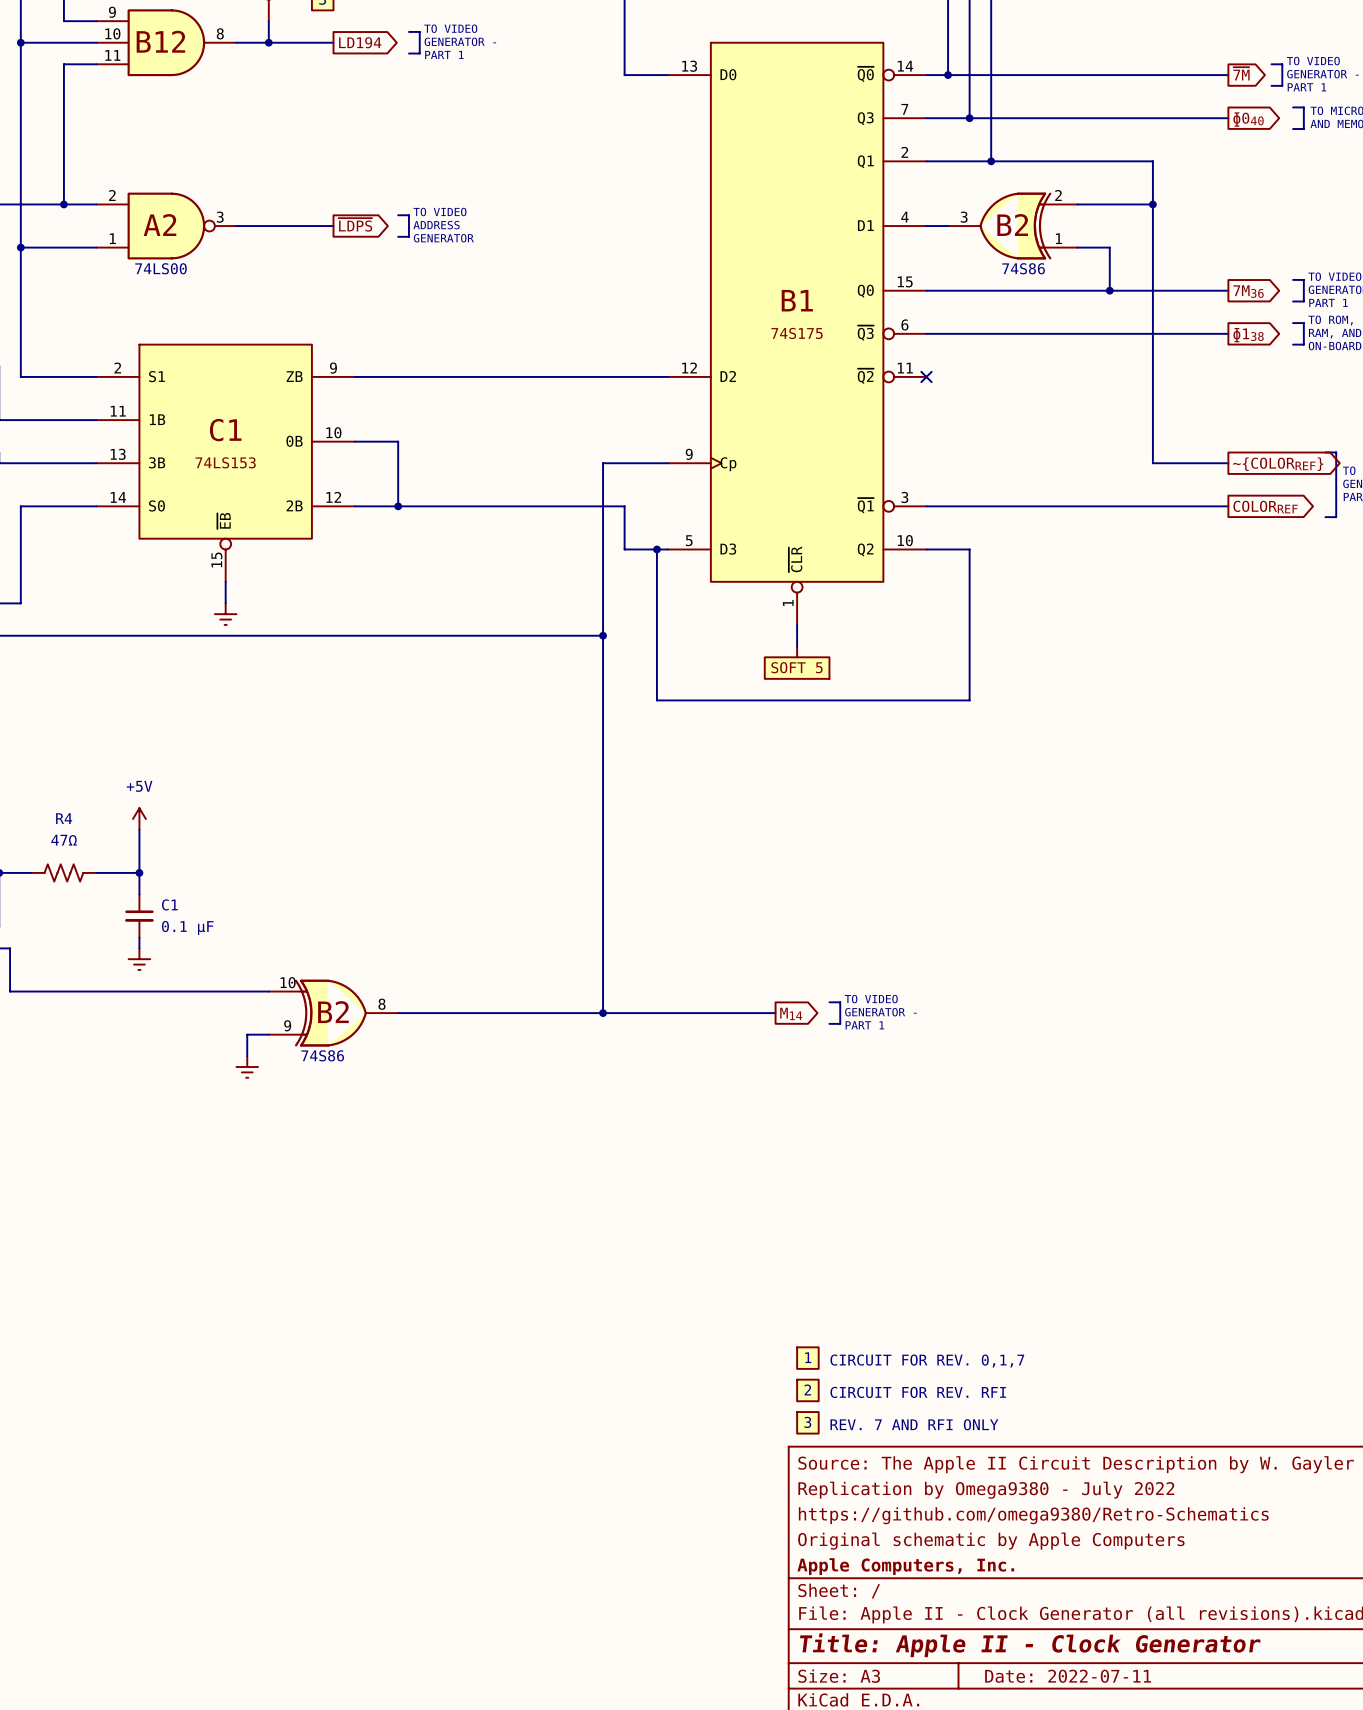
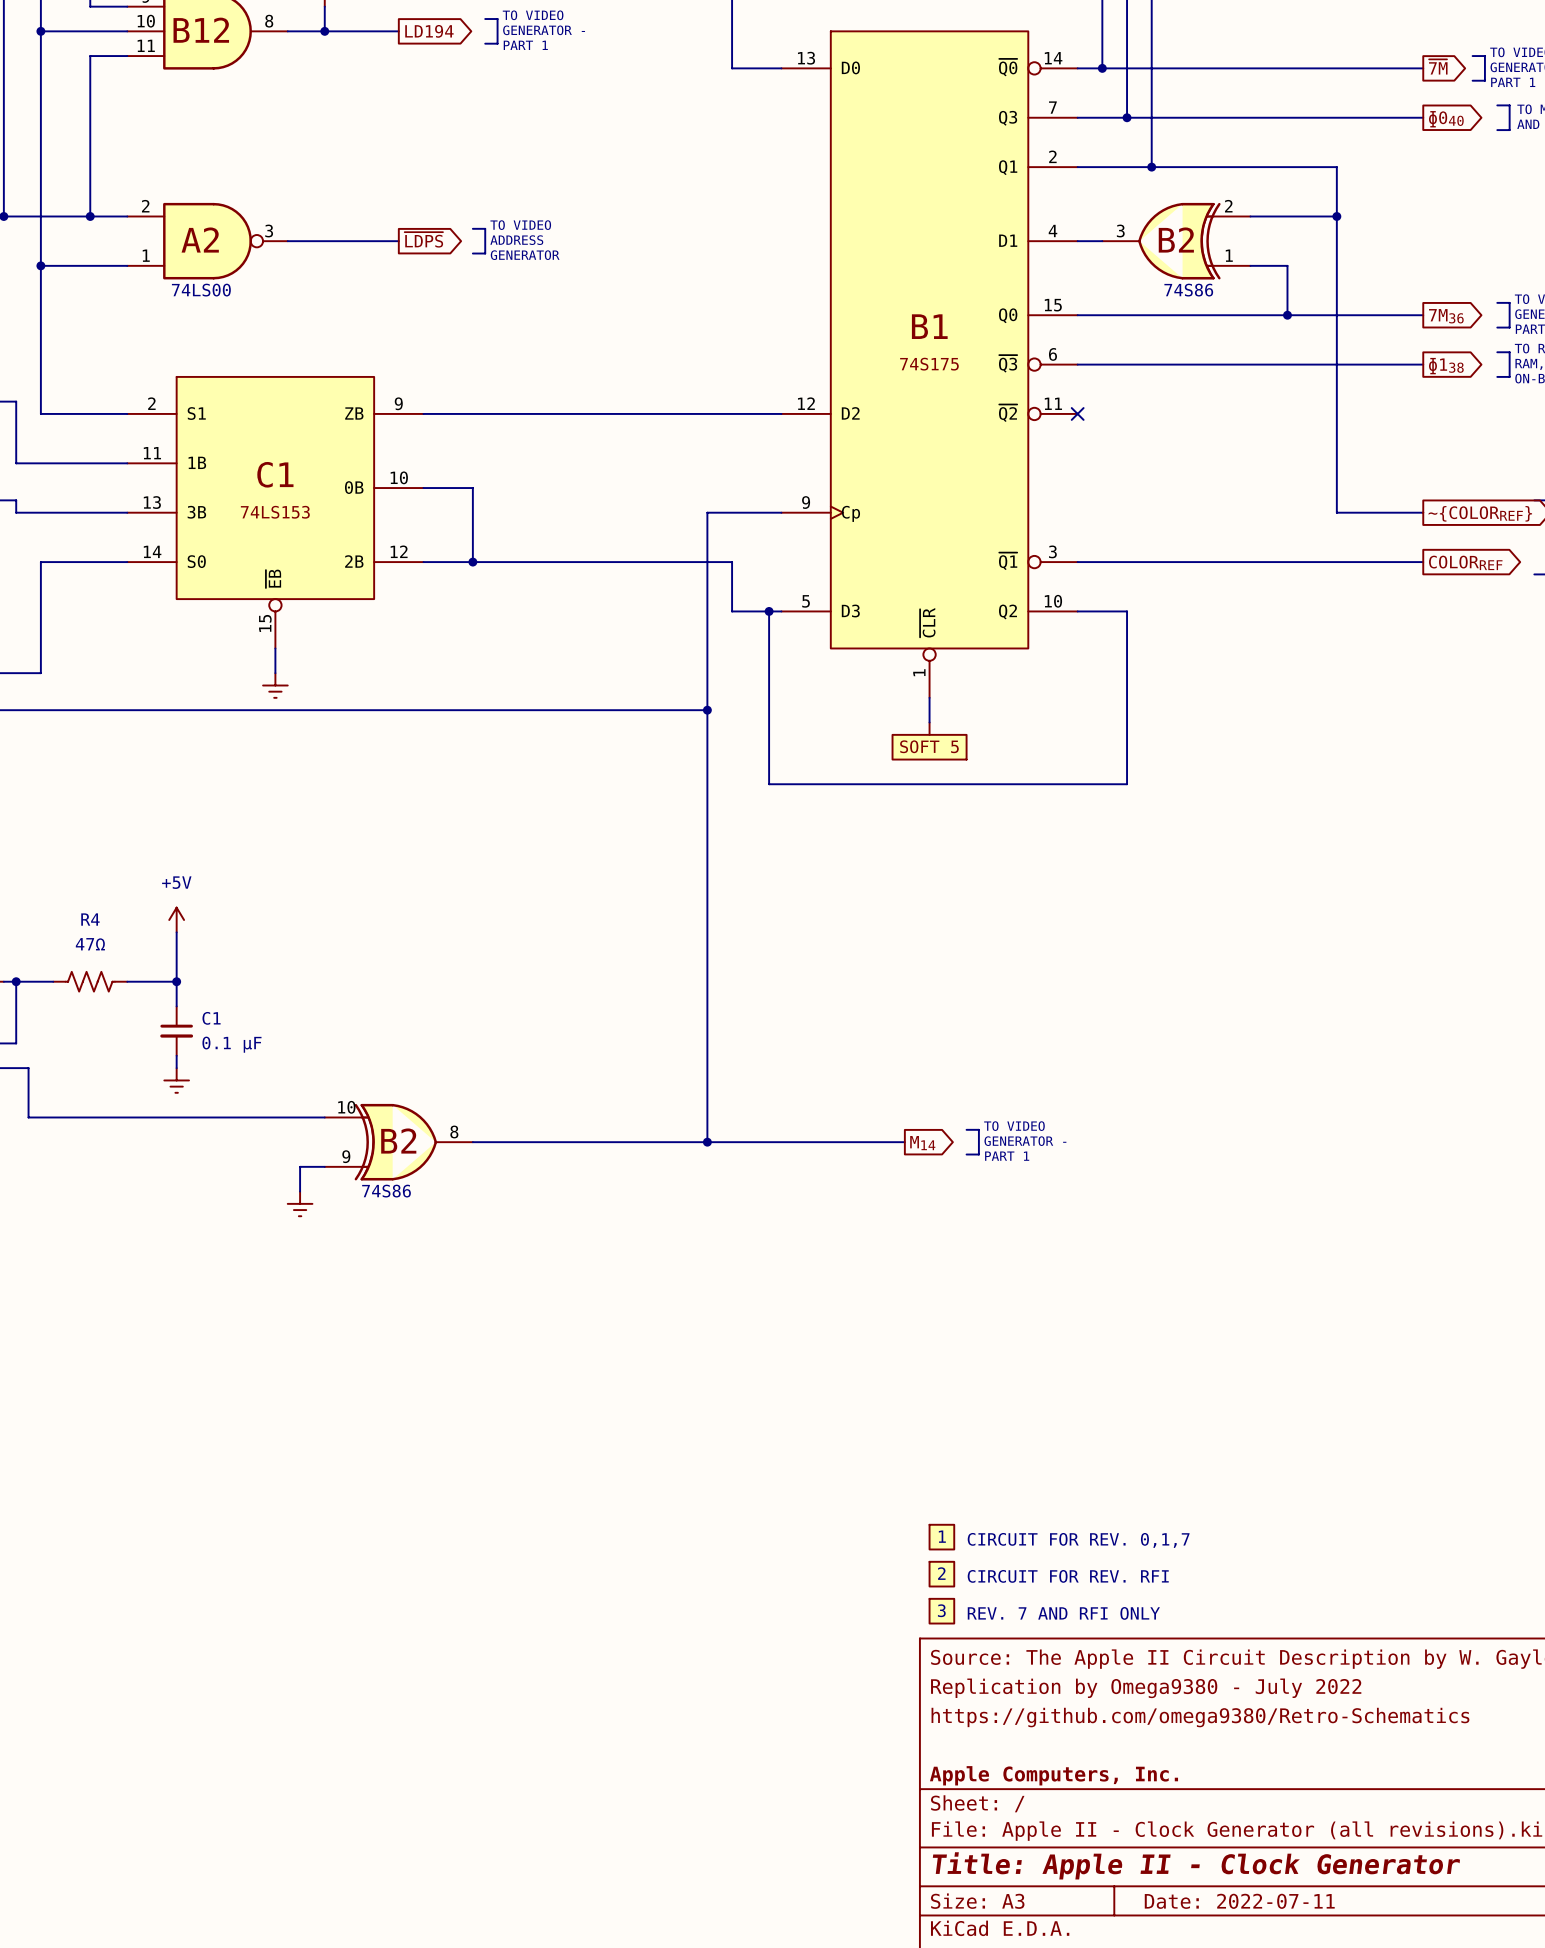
title block: Original schematic by Apple Computers (991, 1541) -> none

